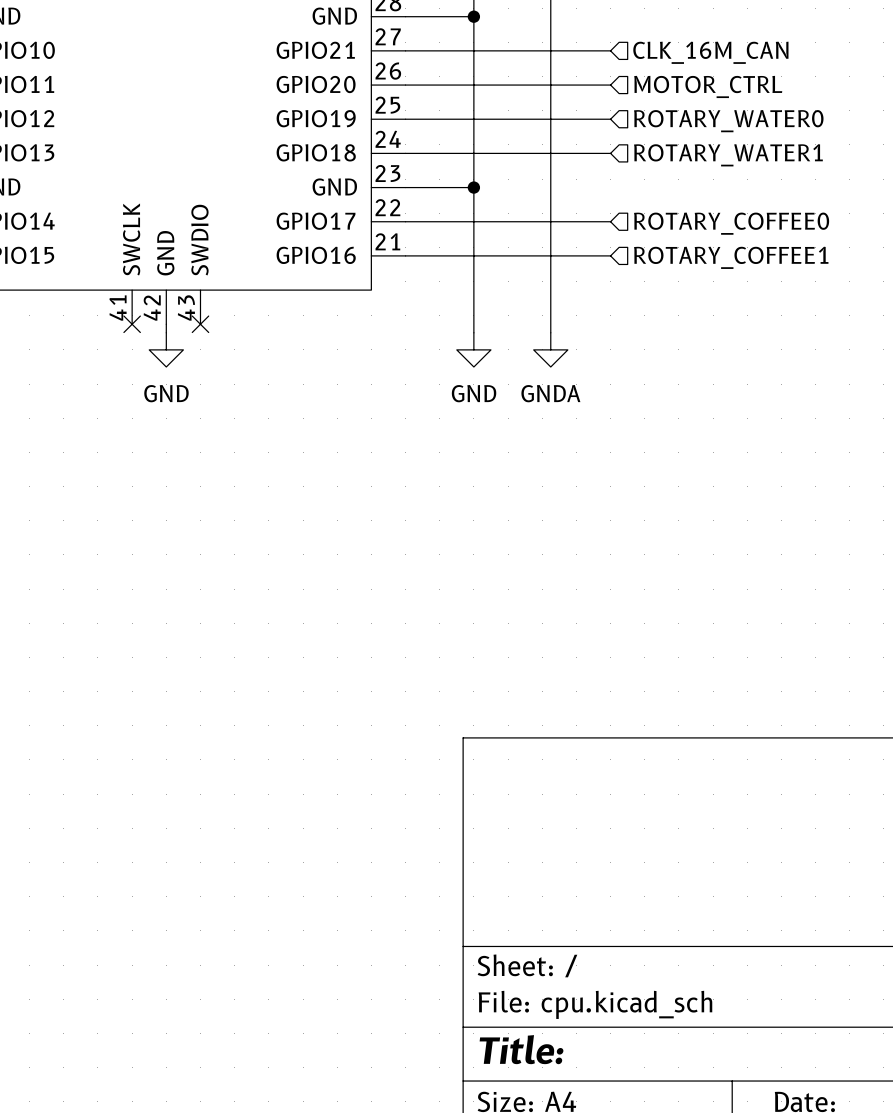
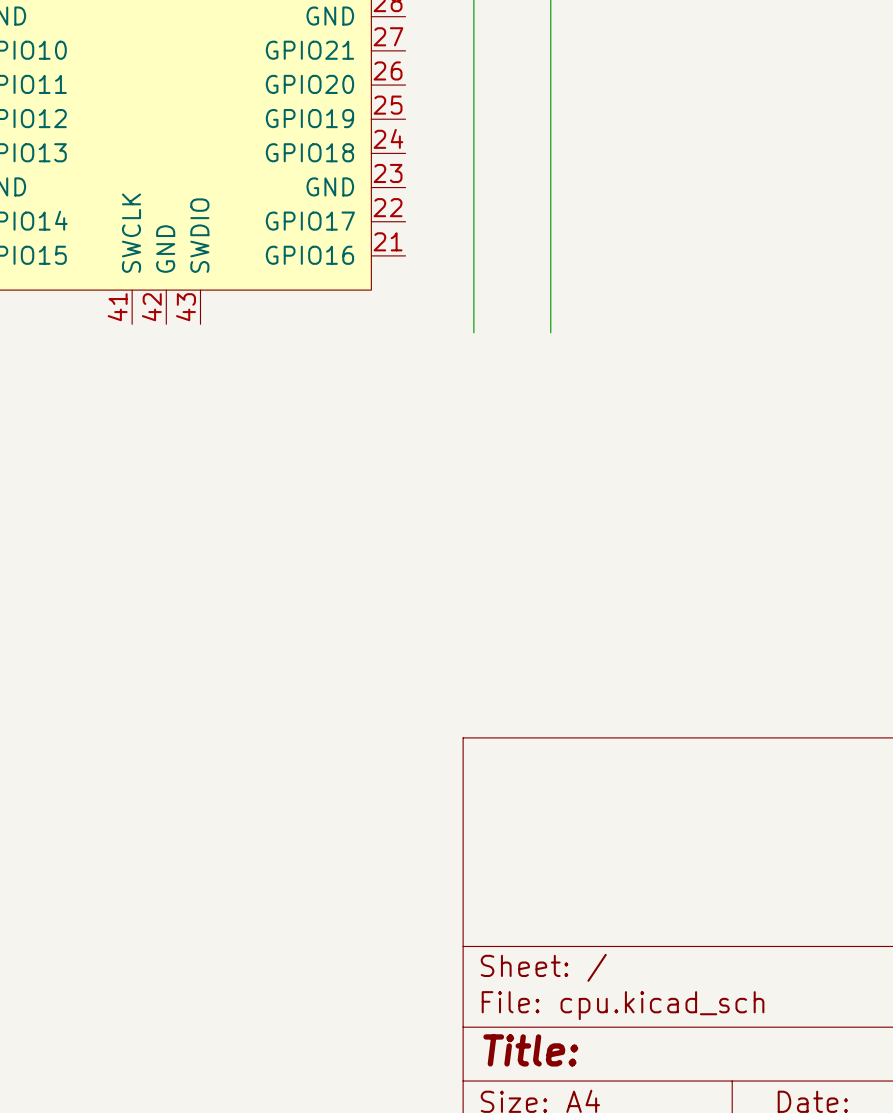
wire: (405, 16) (473, 16) -> none
junction: (473, 16) -> none
wire: (405, 50) (610, 50) -> none
hierarchical label: CLK_16M_CAN (710, 52) -> none
wire: (405, 85) (610, 85) -> none
hierarchical label: MOTOR_CTRL (708, 86) -> none
wire: (405, 119) (610, 119) -> none
hierarchical label: ROTARY_WATER0 (728, 121) -> none
wire: (405, 153) (610, 153) -> none
hierarchical label: ROTARY_WATER1 (728, 155) -> none
wire: (405, 187) (473, 187) -> none
junction: (473, 187) -> none
wire: (405, 221) (610, 221) -> none
hierarchical label: ROTARY_COFFEE0 (731, 223) -> none
wire: (405, 255) (610, 255) -> none
hierarchical label: ROTARY_COFFEE1 (731, 257) -> none
no-connect mark: (132, 324) -> none
wire: (166, 324) (166, 332) -> none
no-connect mark: (200, 324) -> none
power symbol: GND (166, 349) -> none
power symbol: GND (473, 349) -> none
power symbol: GNDA (550, 349) -> none

